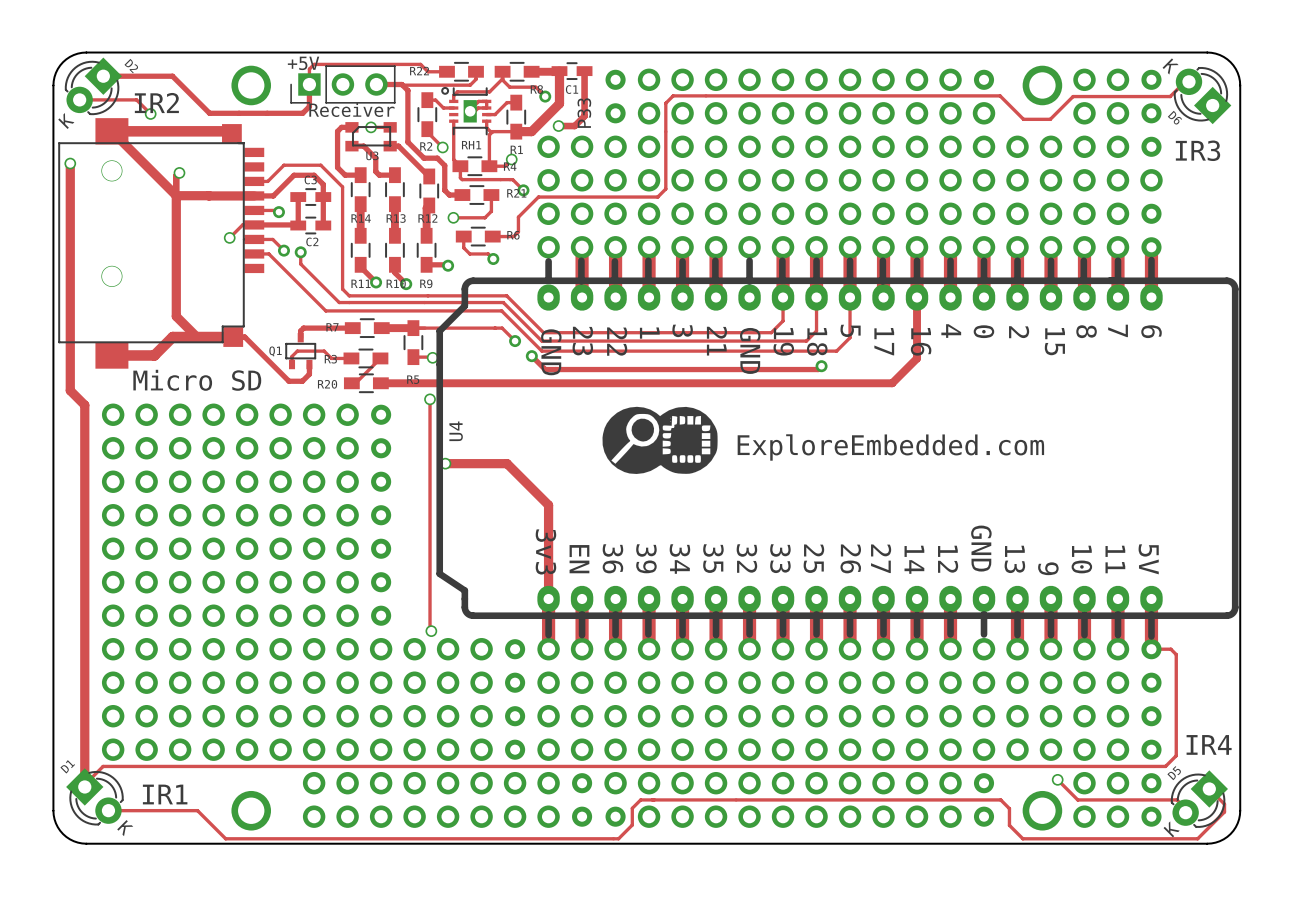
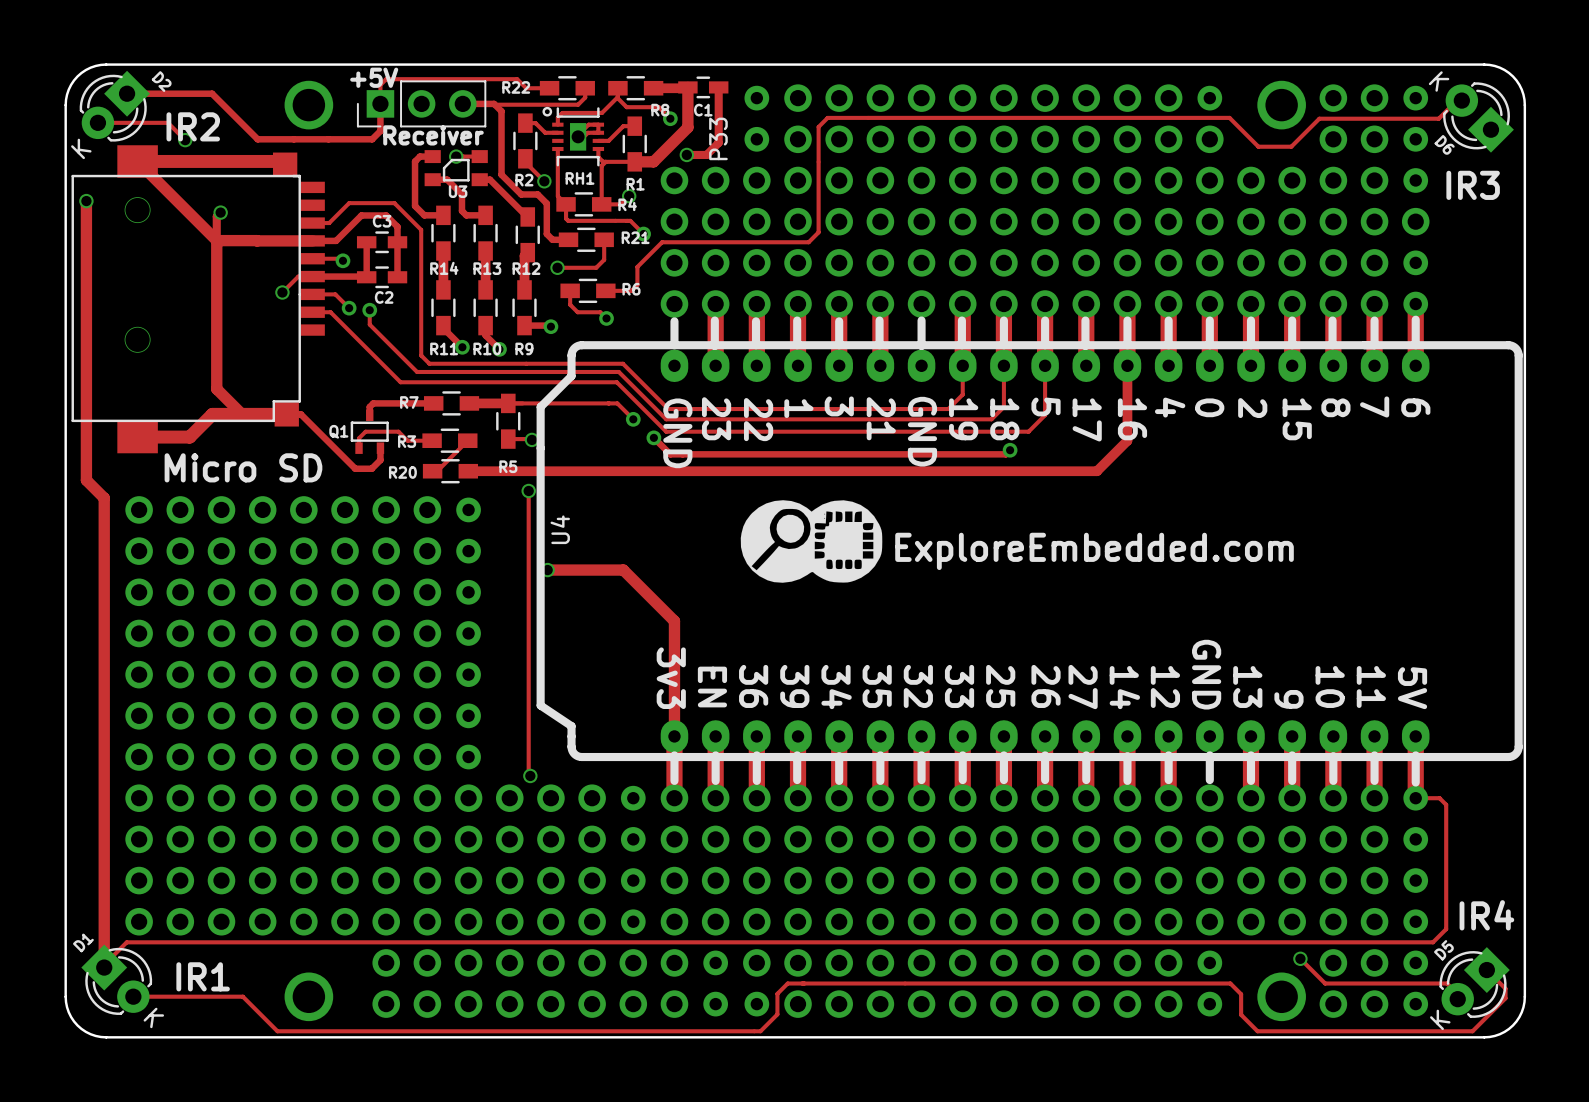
U3 footprint: [345, 122, 397, 152] -> [424, 150, 488, 187]

